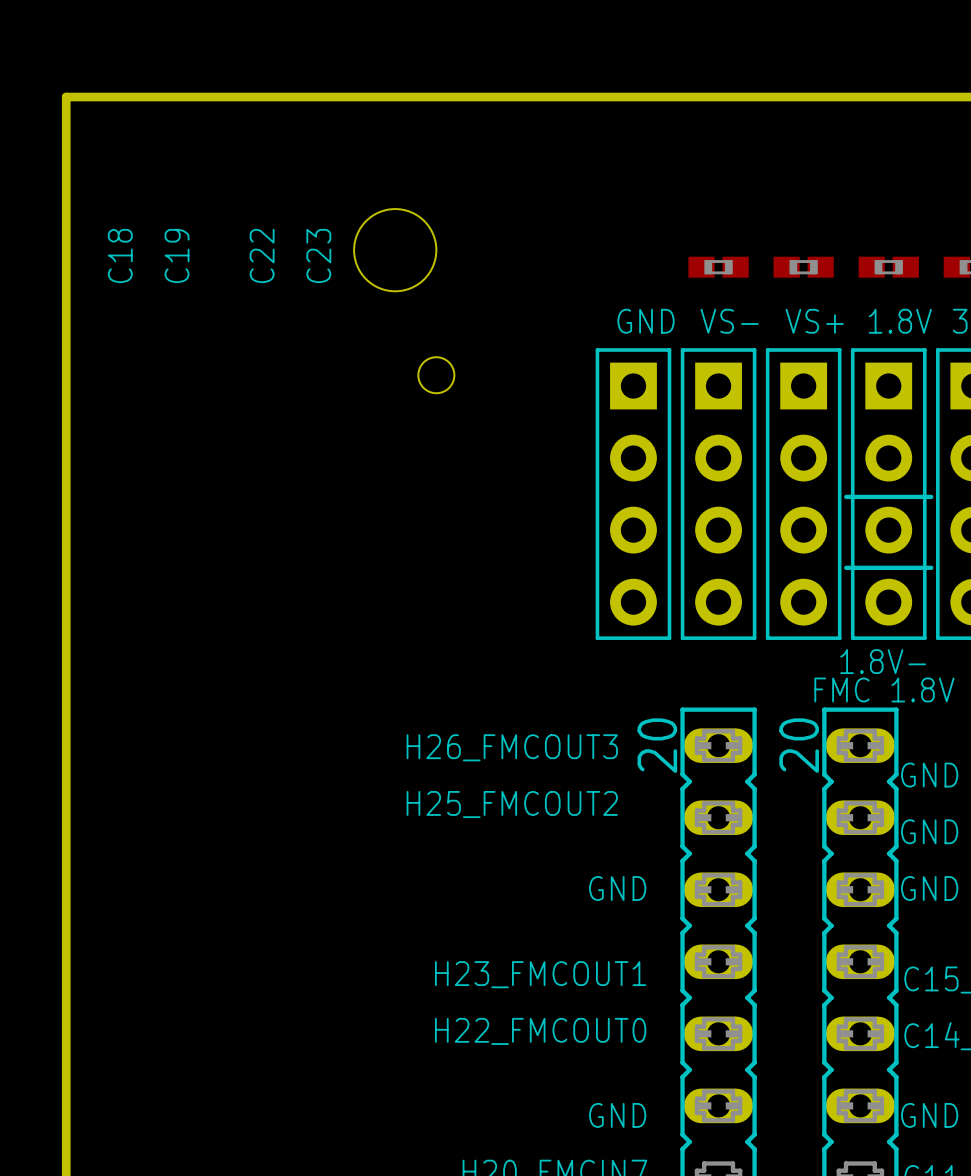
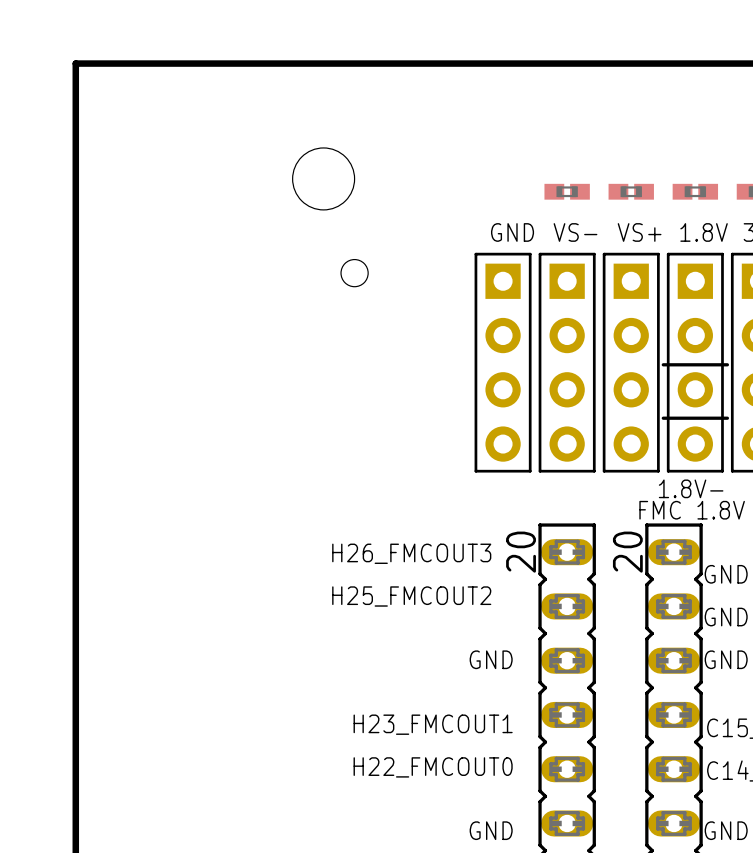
text: C18 (120, 255) -> none
text: C19 (177, 255) -> none
text: C22 (262, 255) -> none
text: C23 (318, 255) -> none

